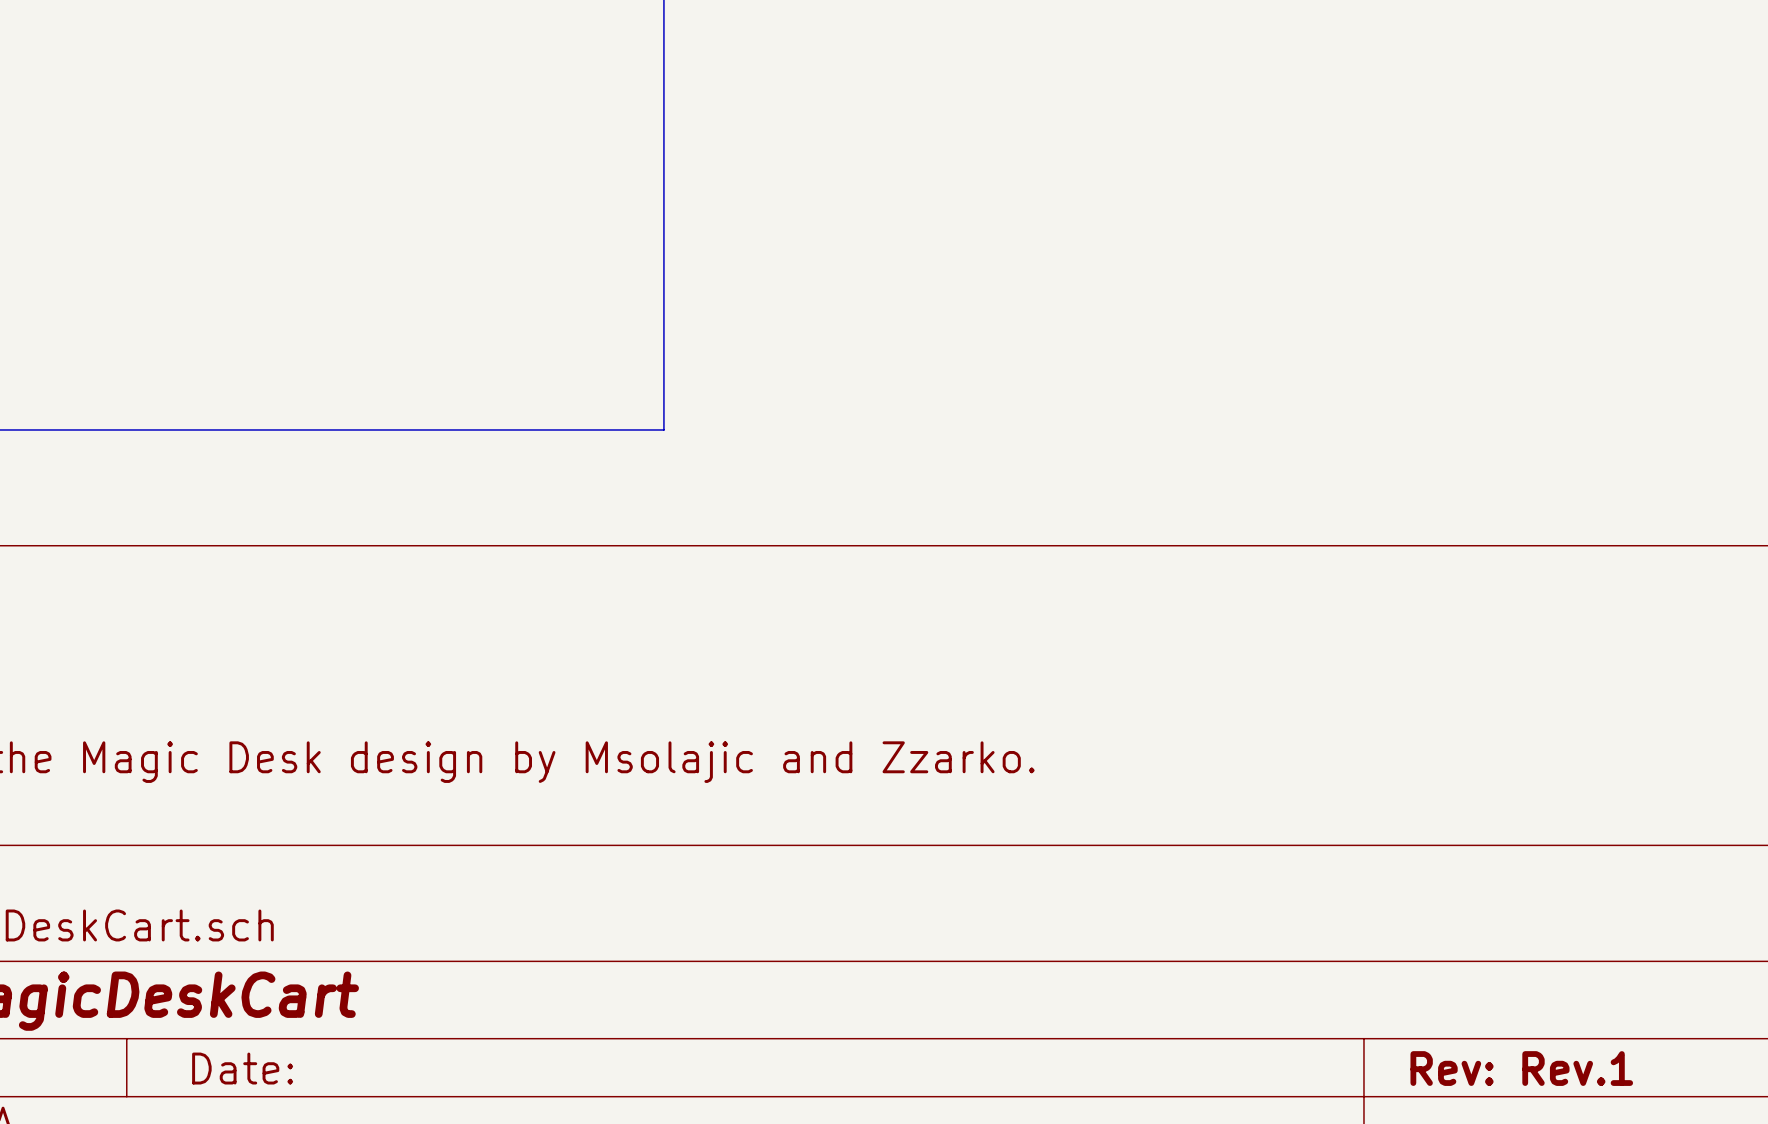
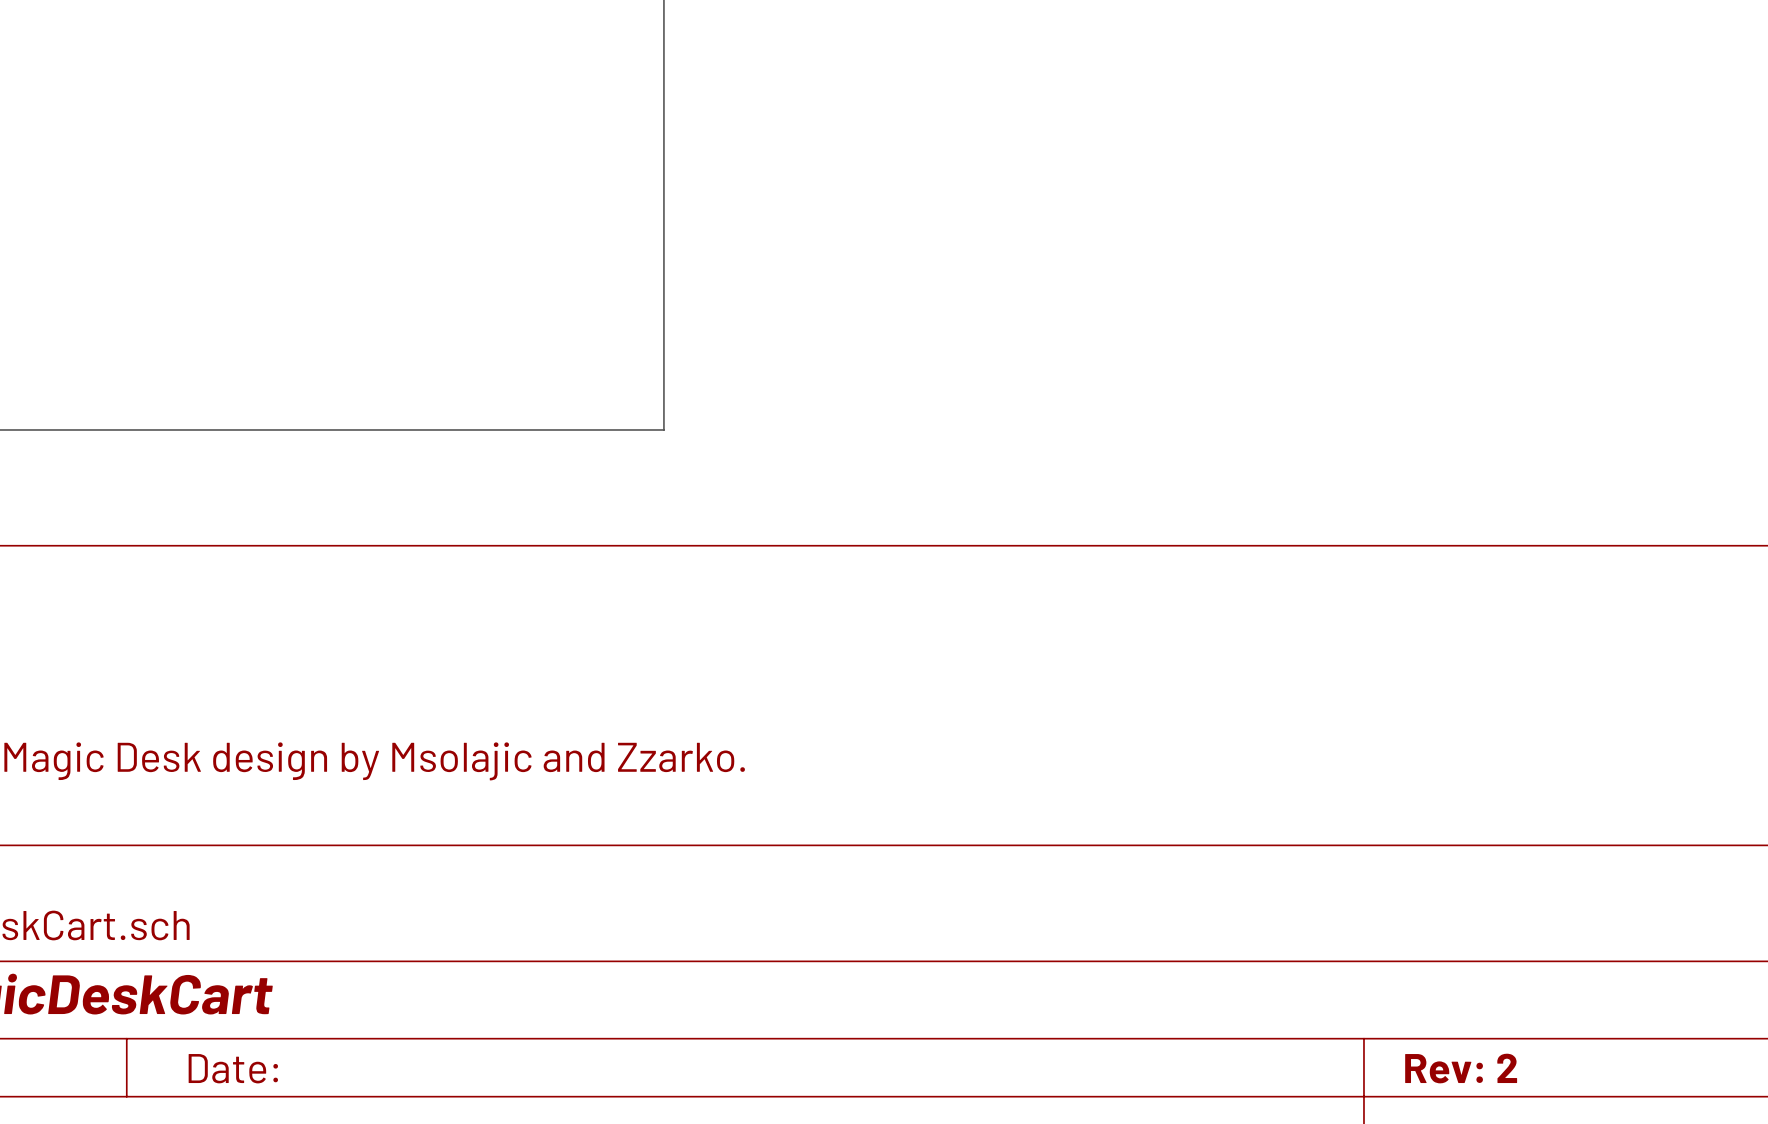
title block: Rev: Rev.1 (1521, 1068) -> Rev: 2 (1461, 1068)

